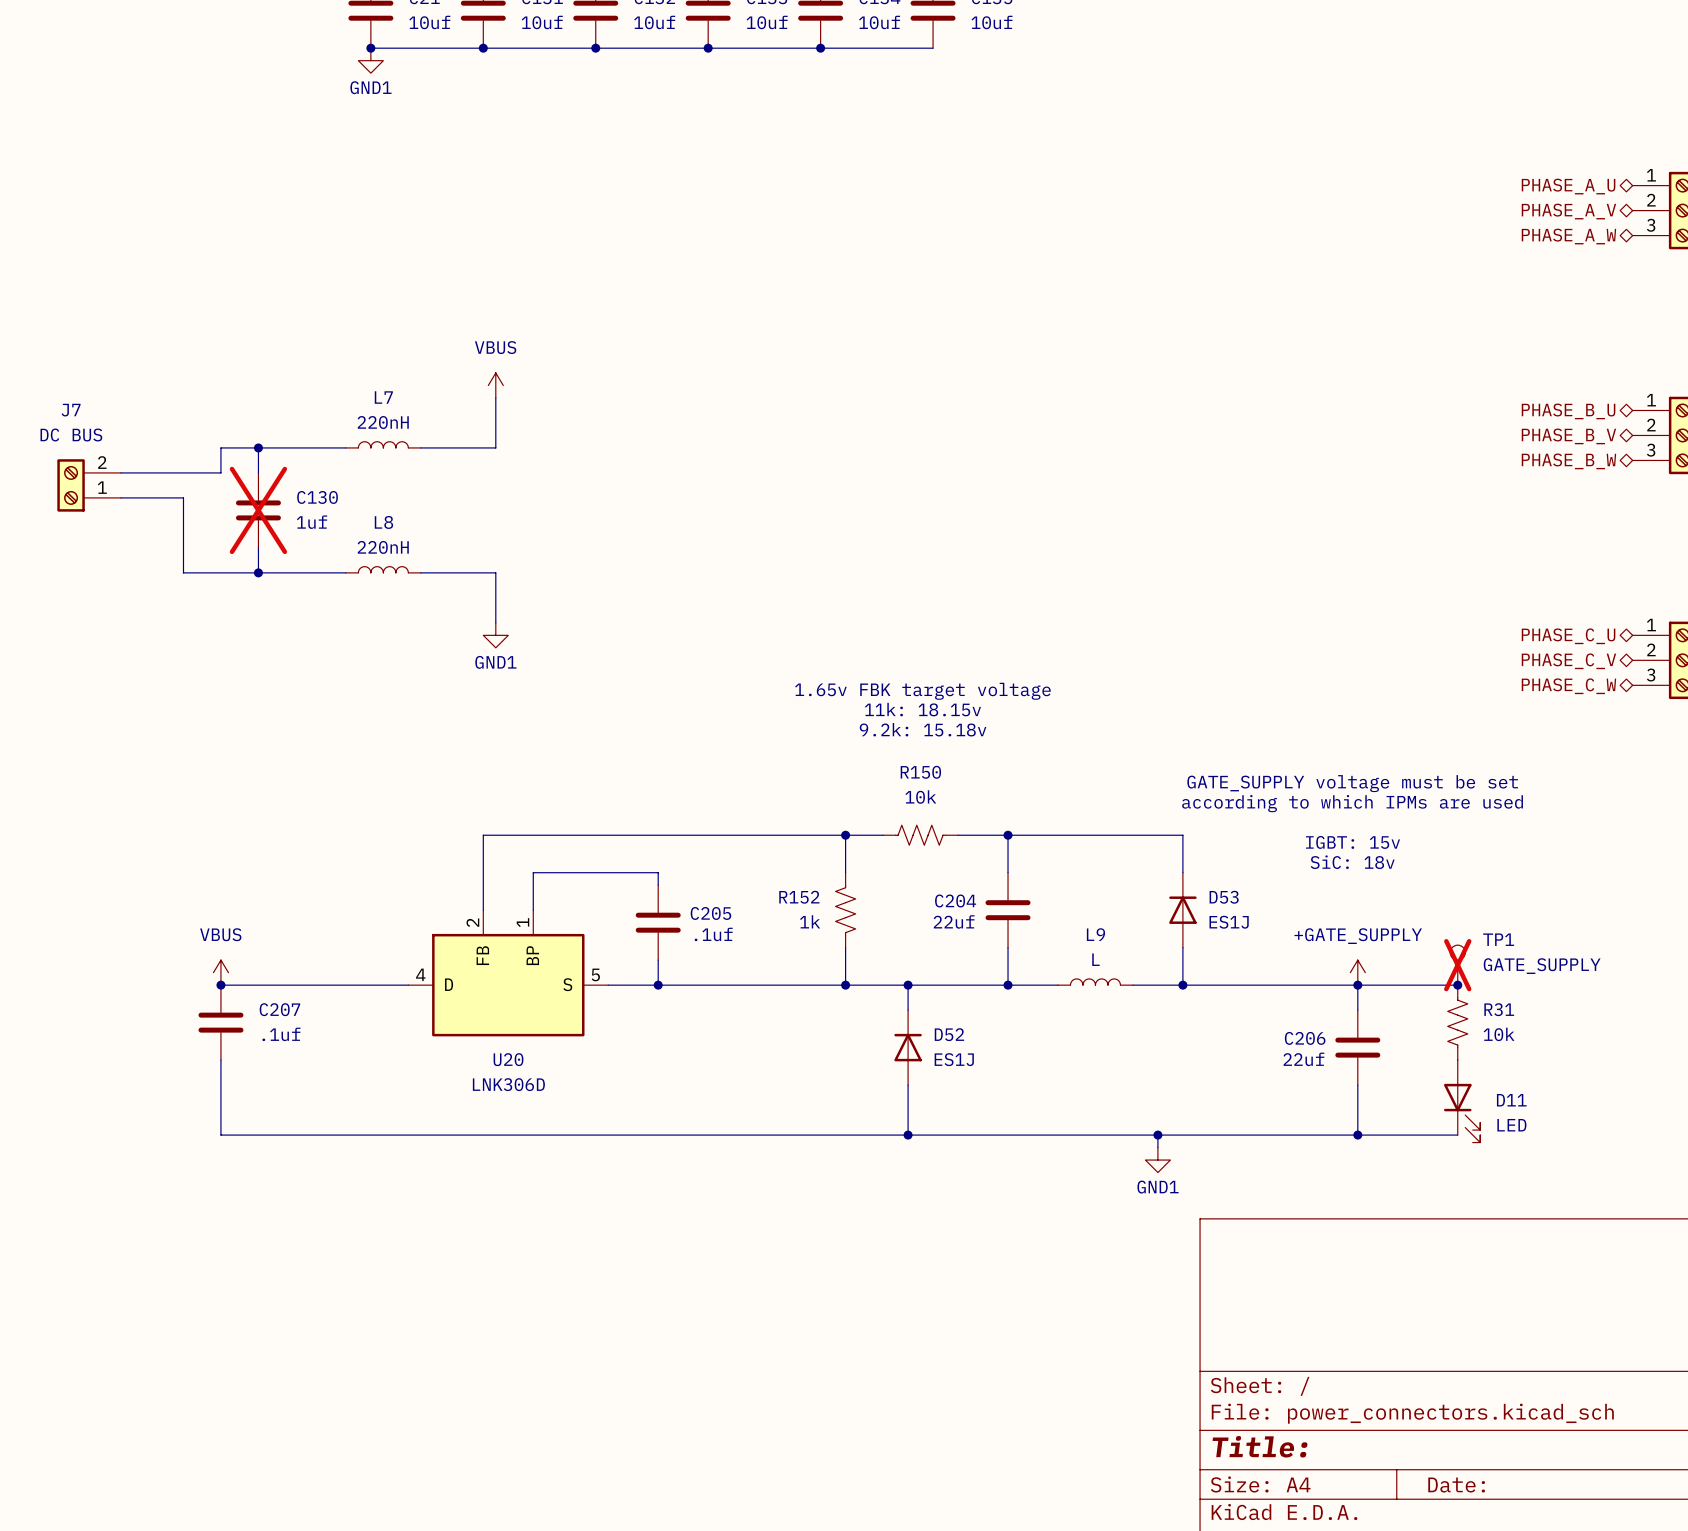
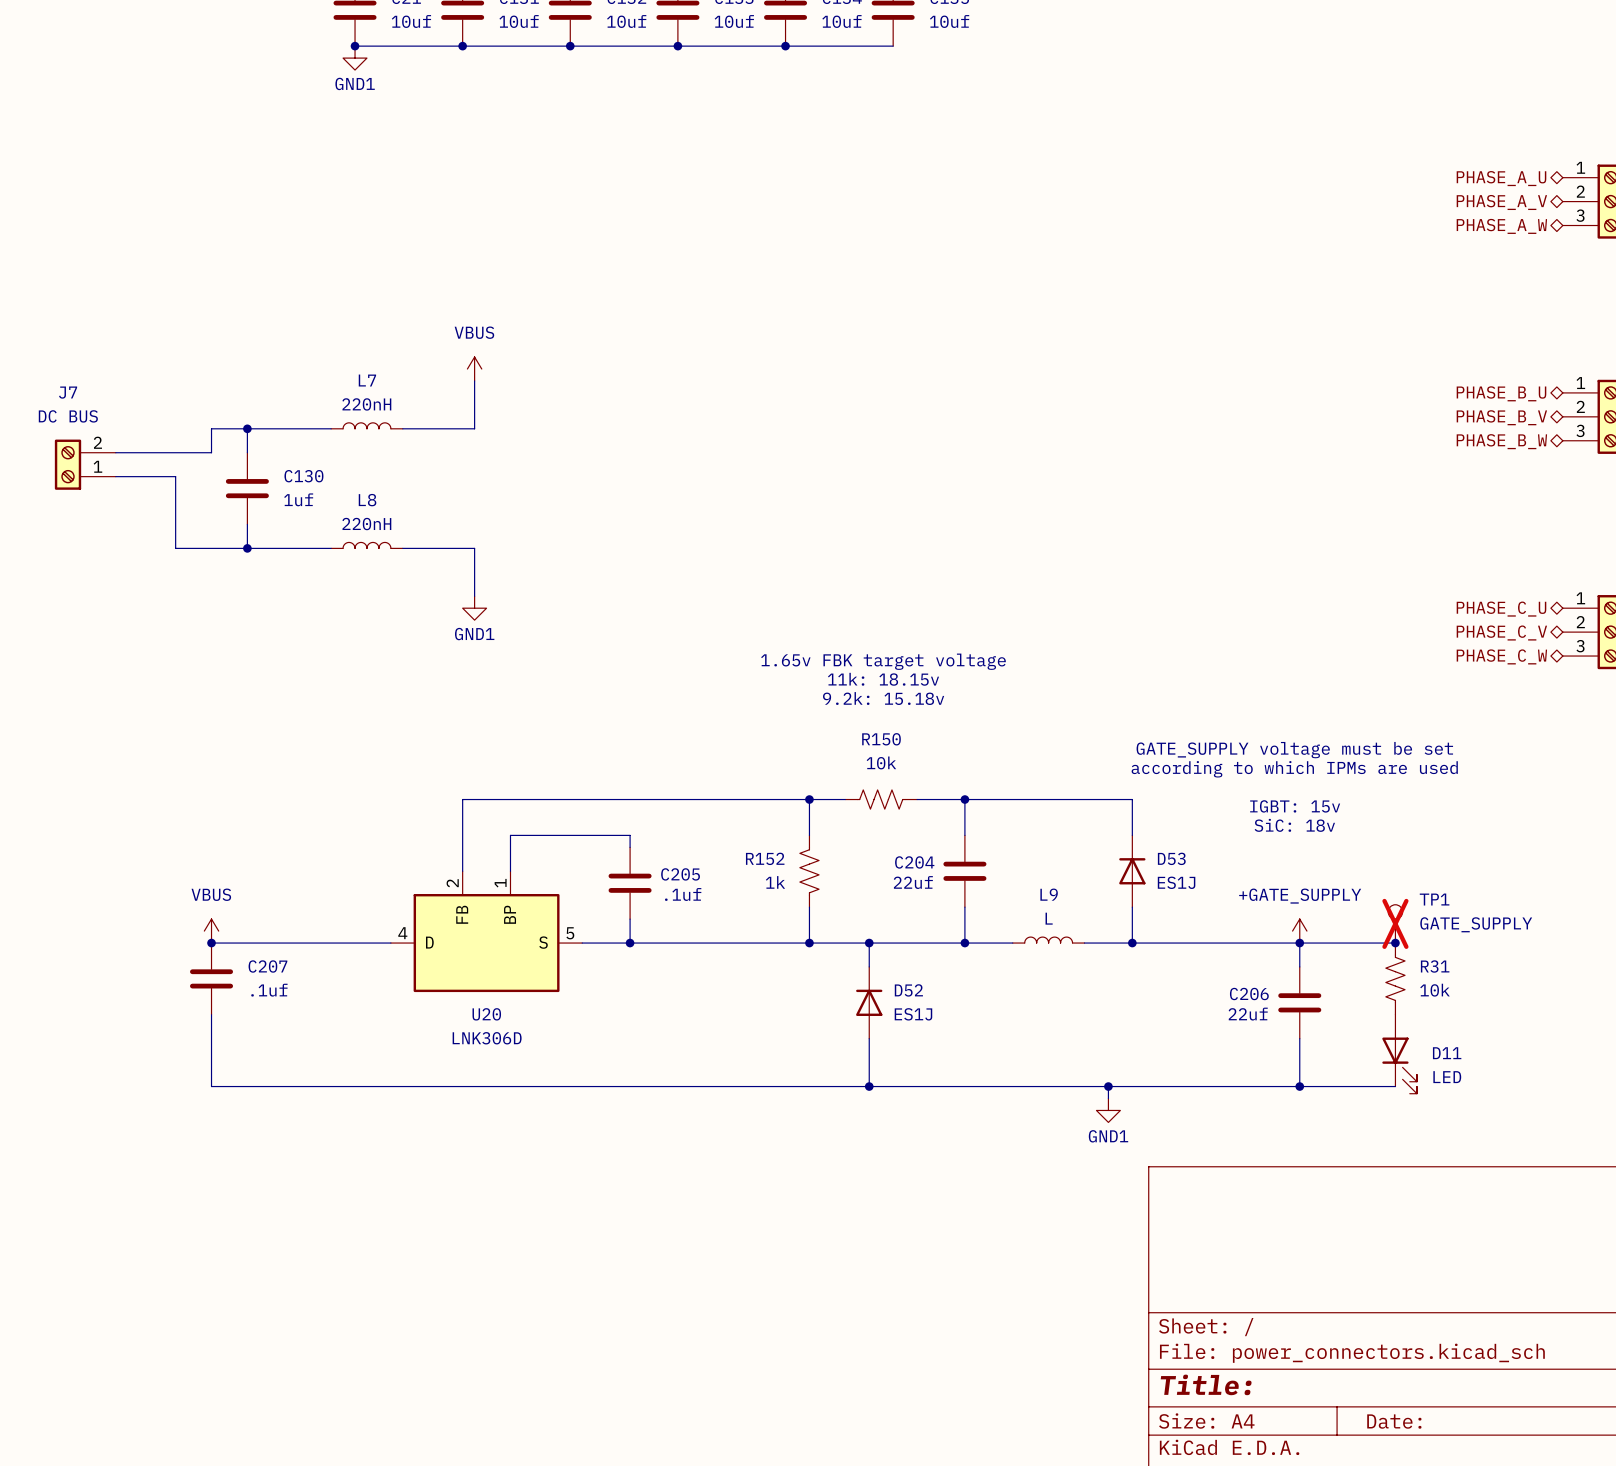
C130 do-not-place cross: (258, 510) -> none

